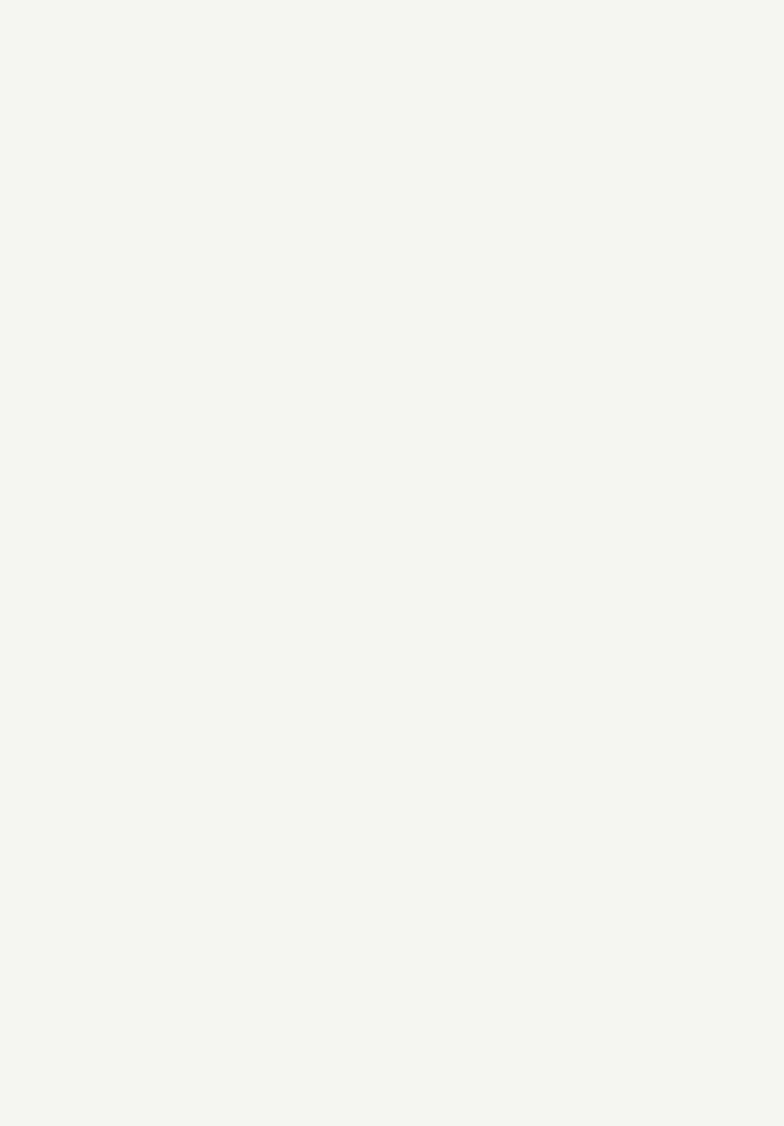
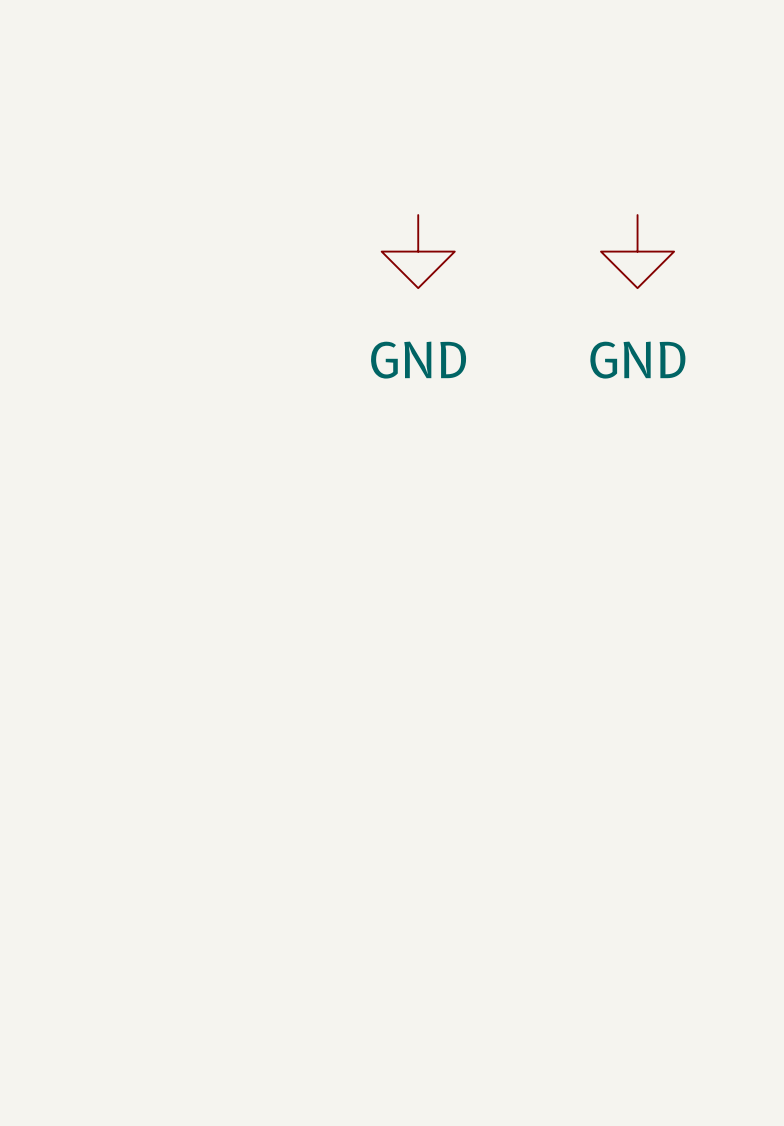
power symbol: none -> GND (418, 251)
power symbol: none -> GND (637, 251)

